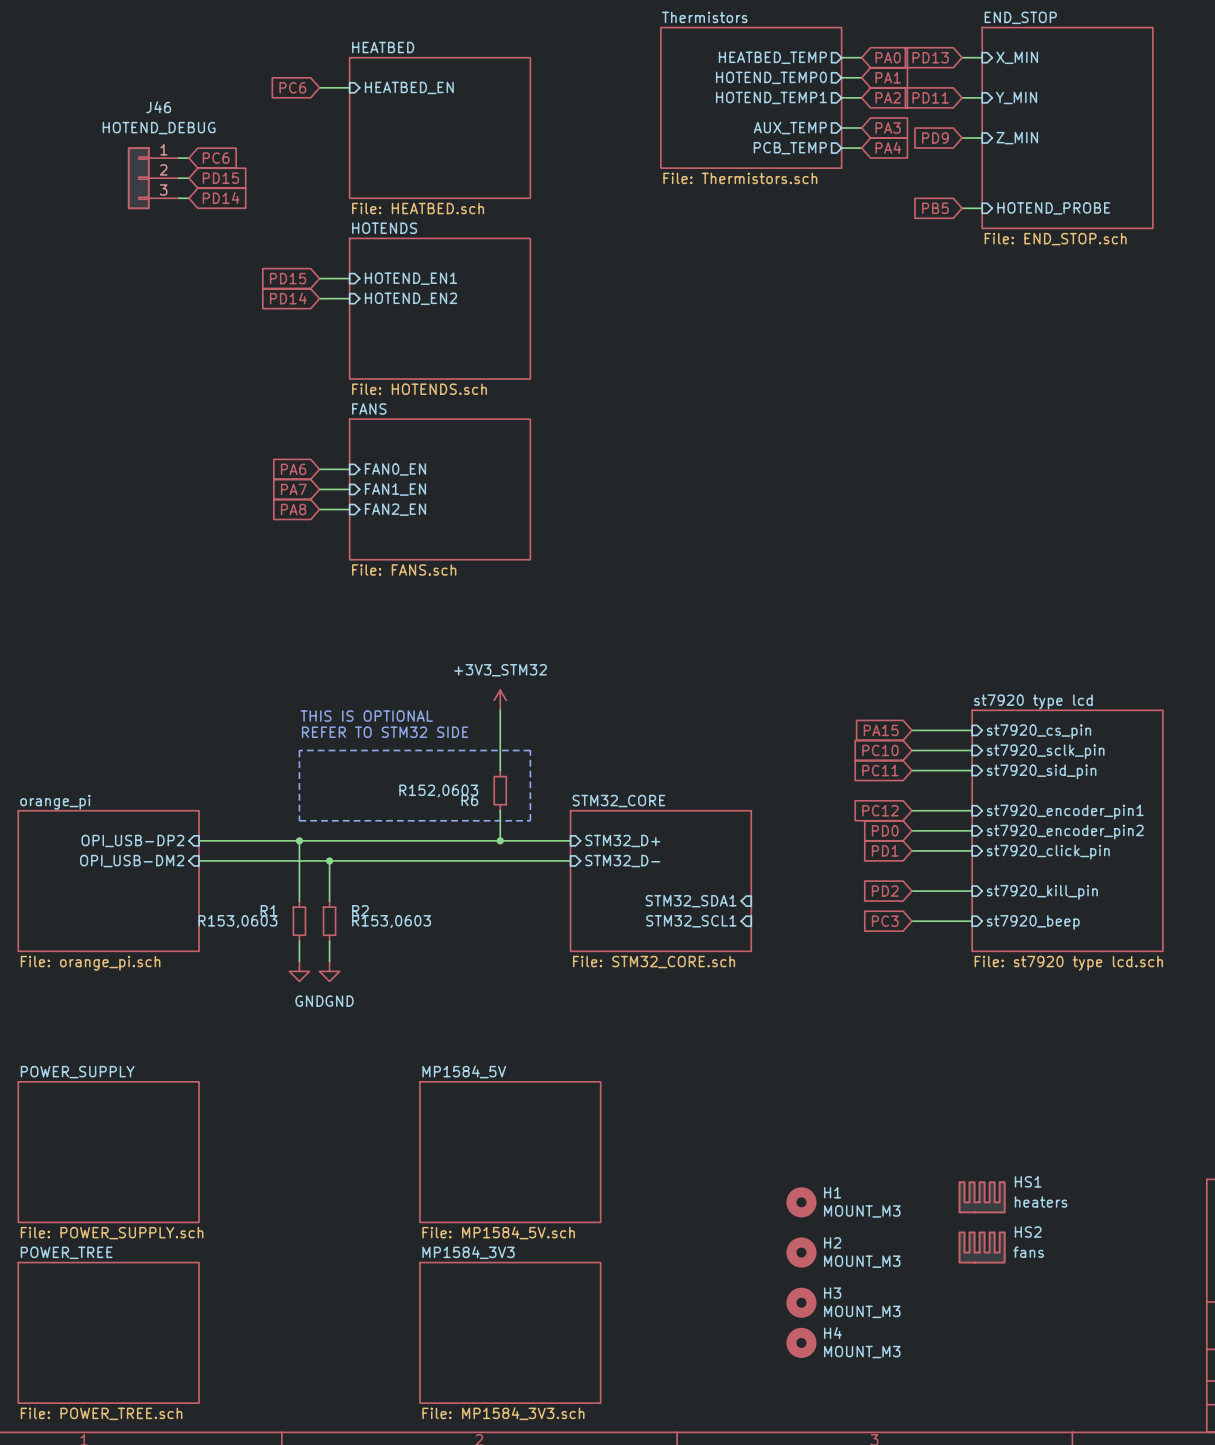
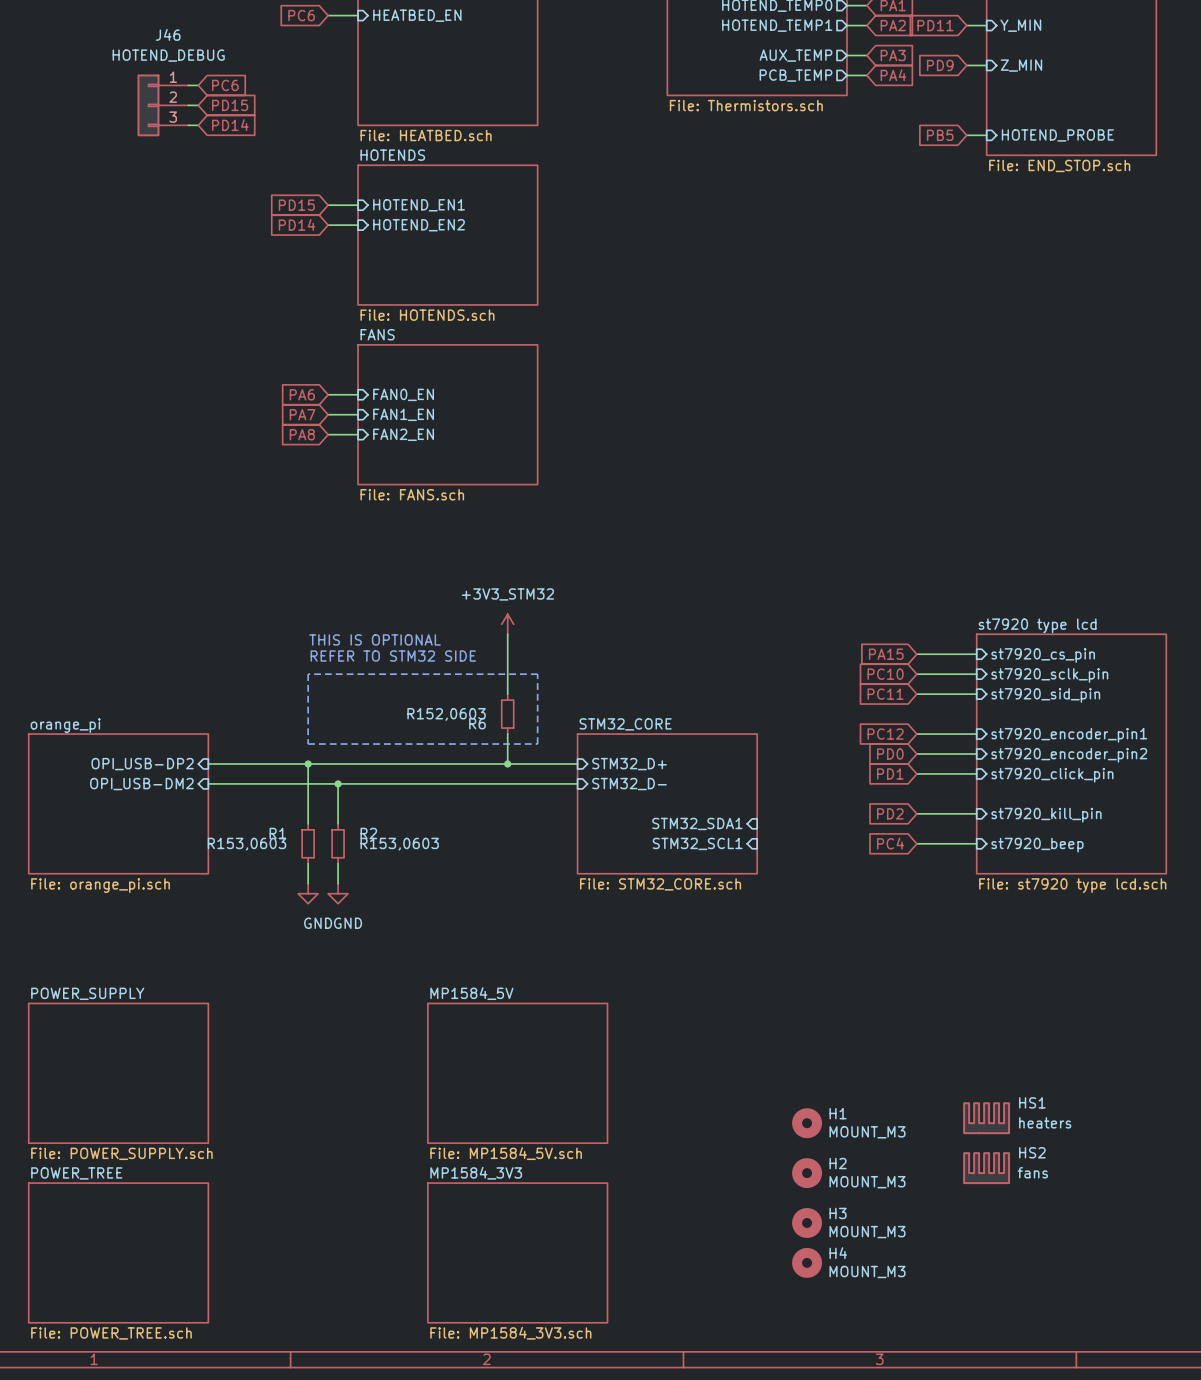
global label: PC3 (885, 921) -> PC4 (890, 843)

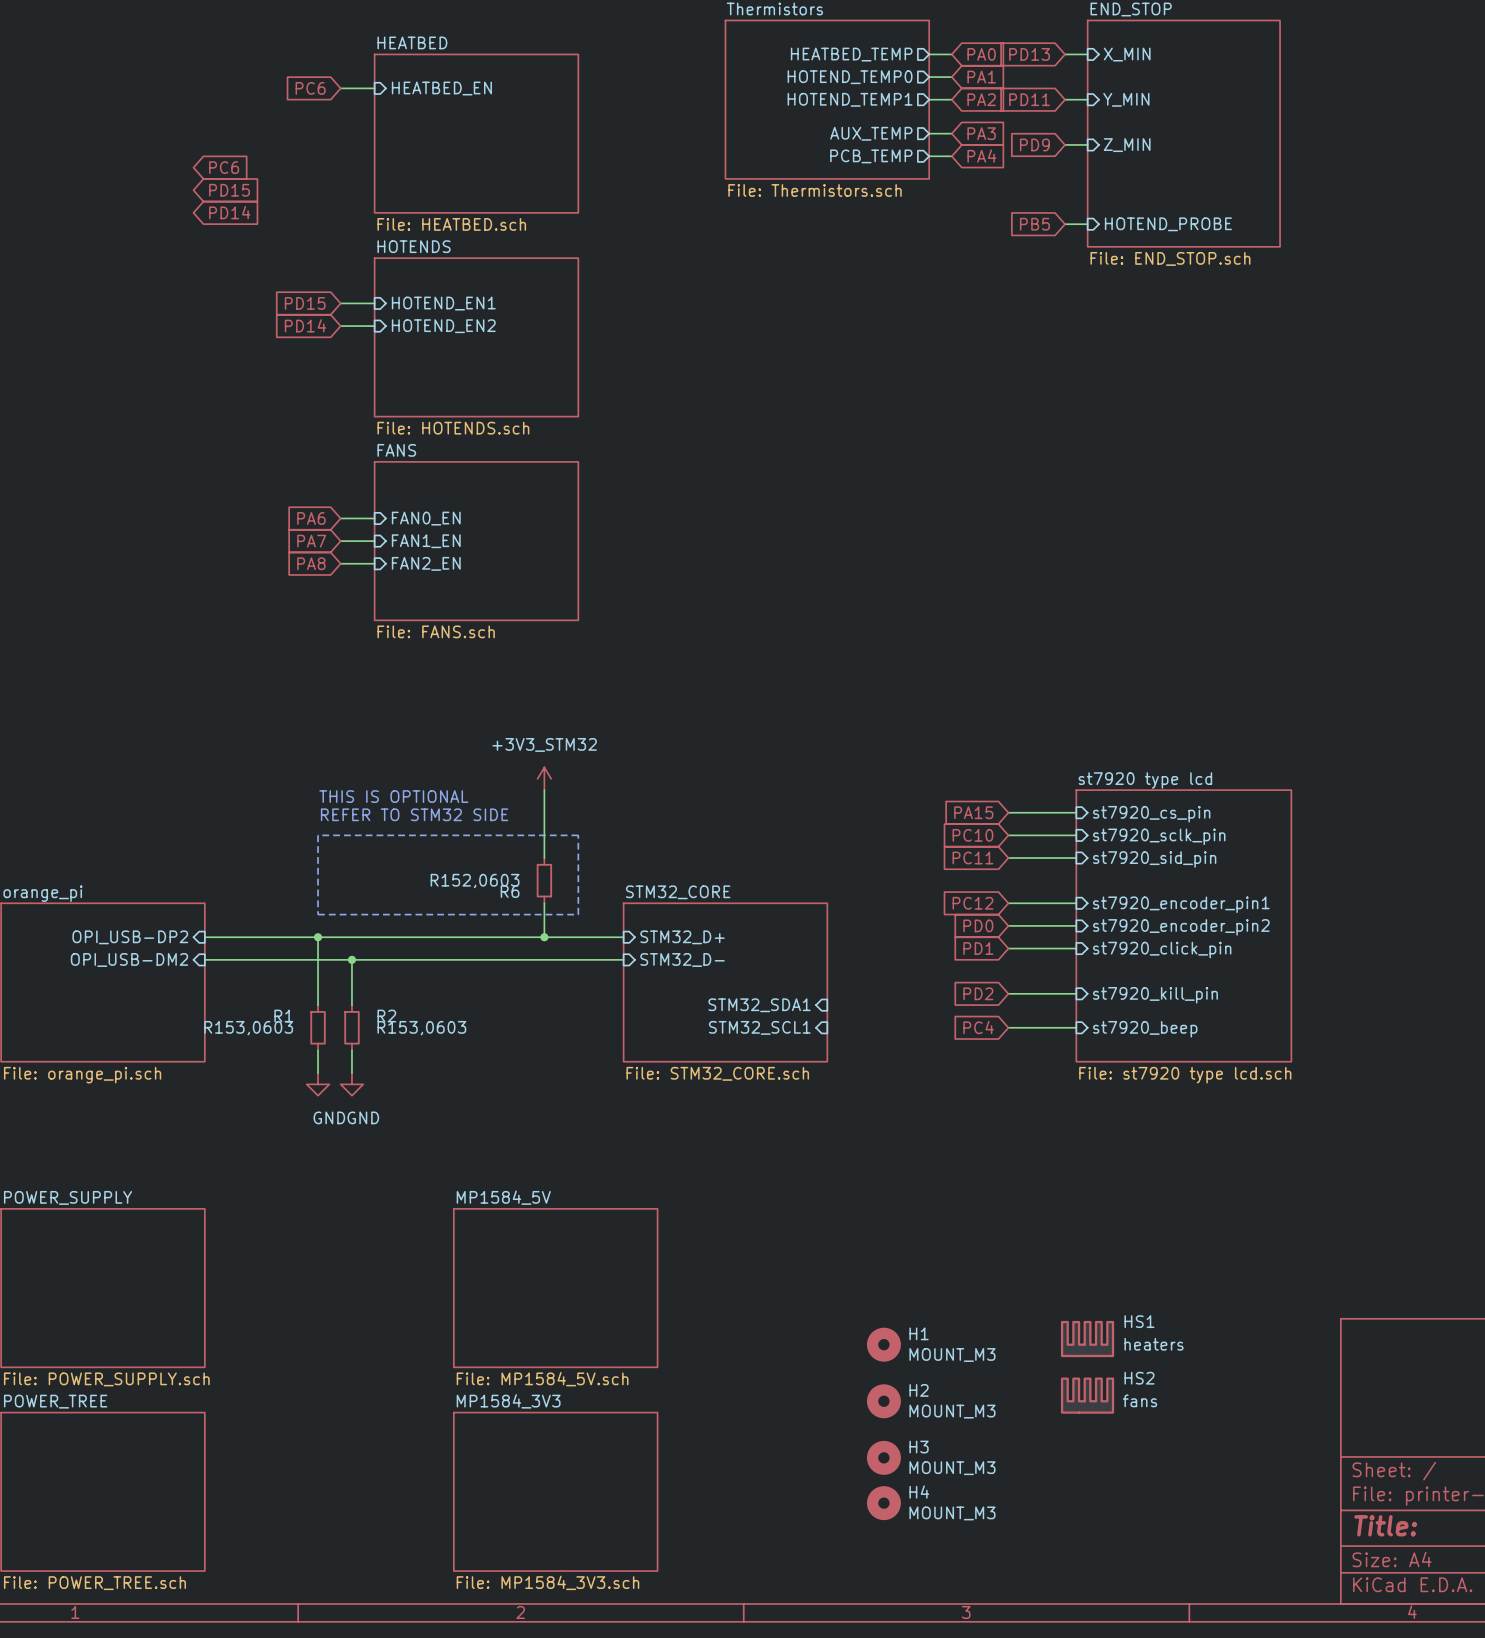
wire: (188, 85) (198, 85) -> none
J46: HOTEND_DEBUG (162, 105) -> none
wire: (188, 105) (198, 105) -> none
wire: (188, 125) (198, 125) -> none

